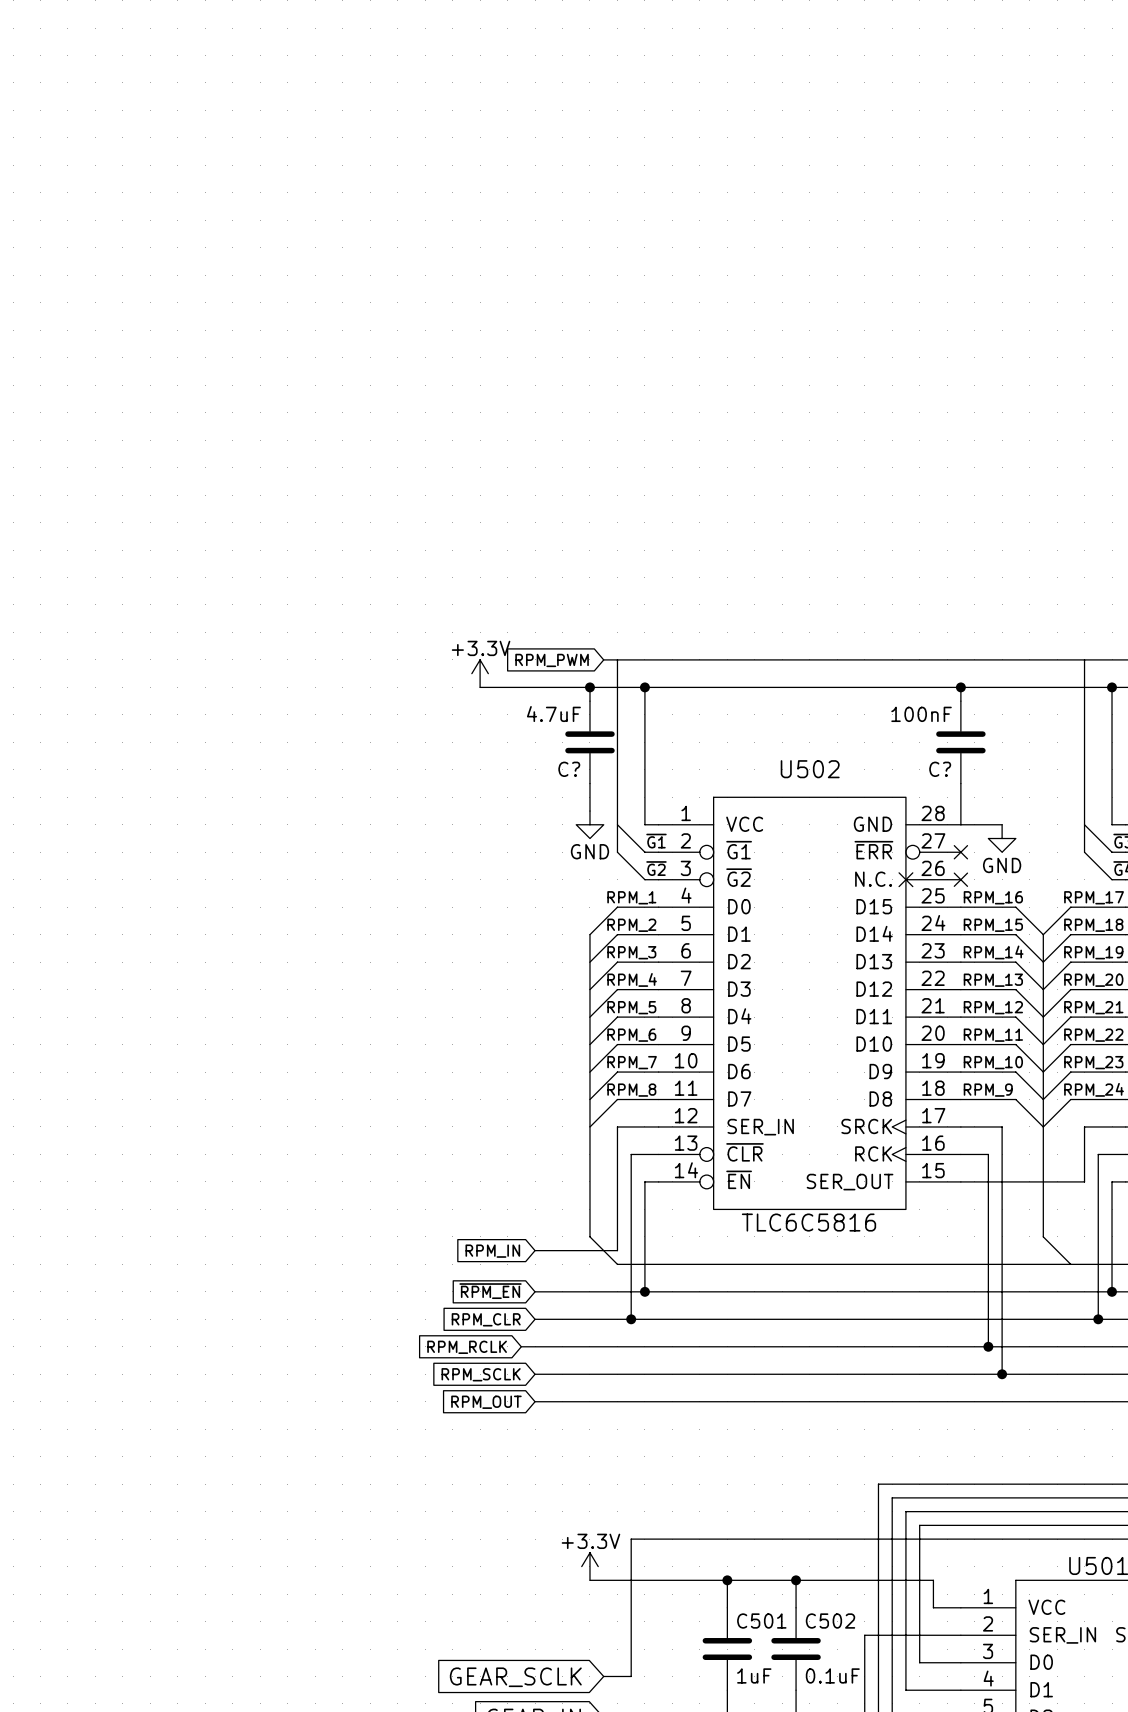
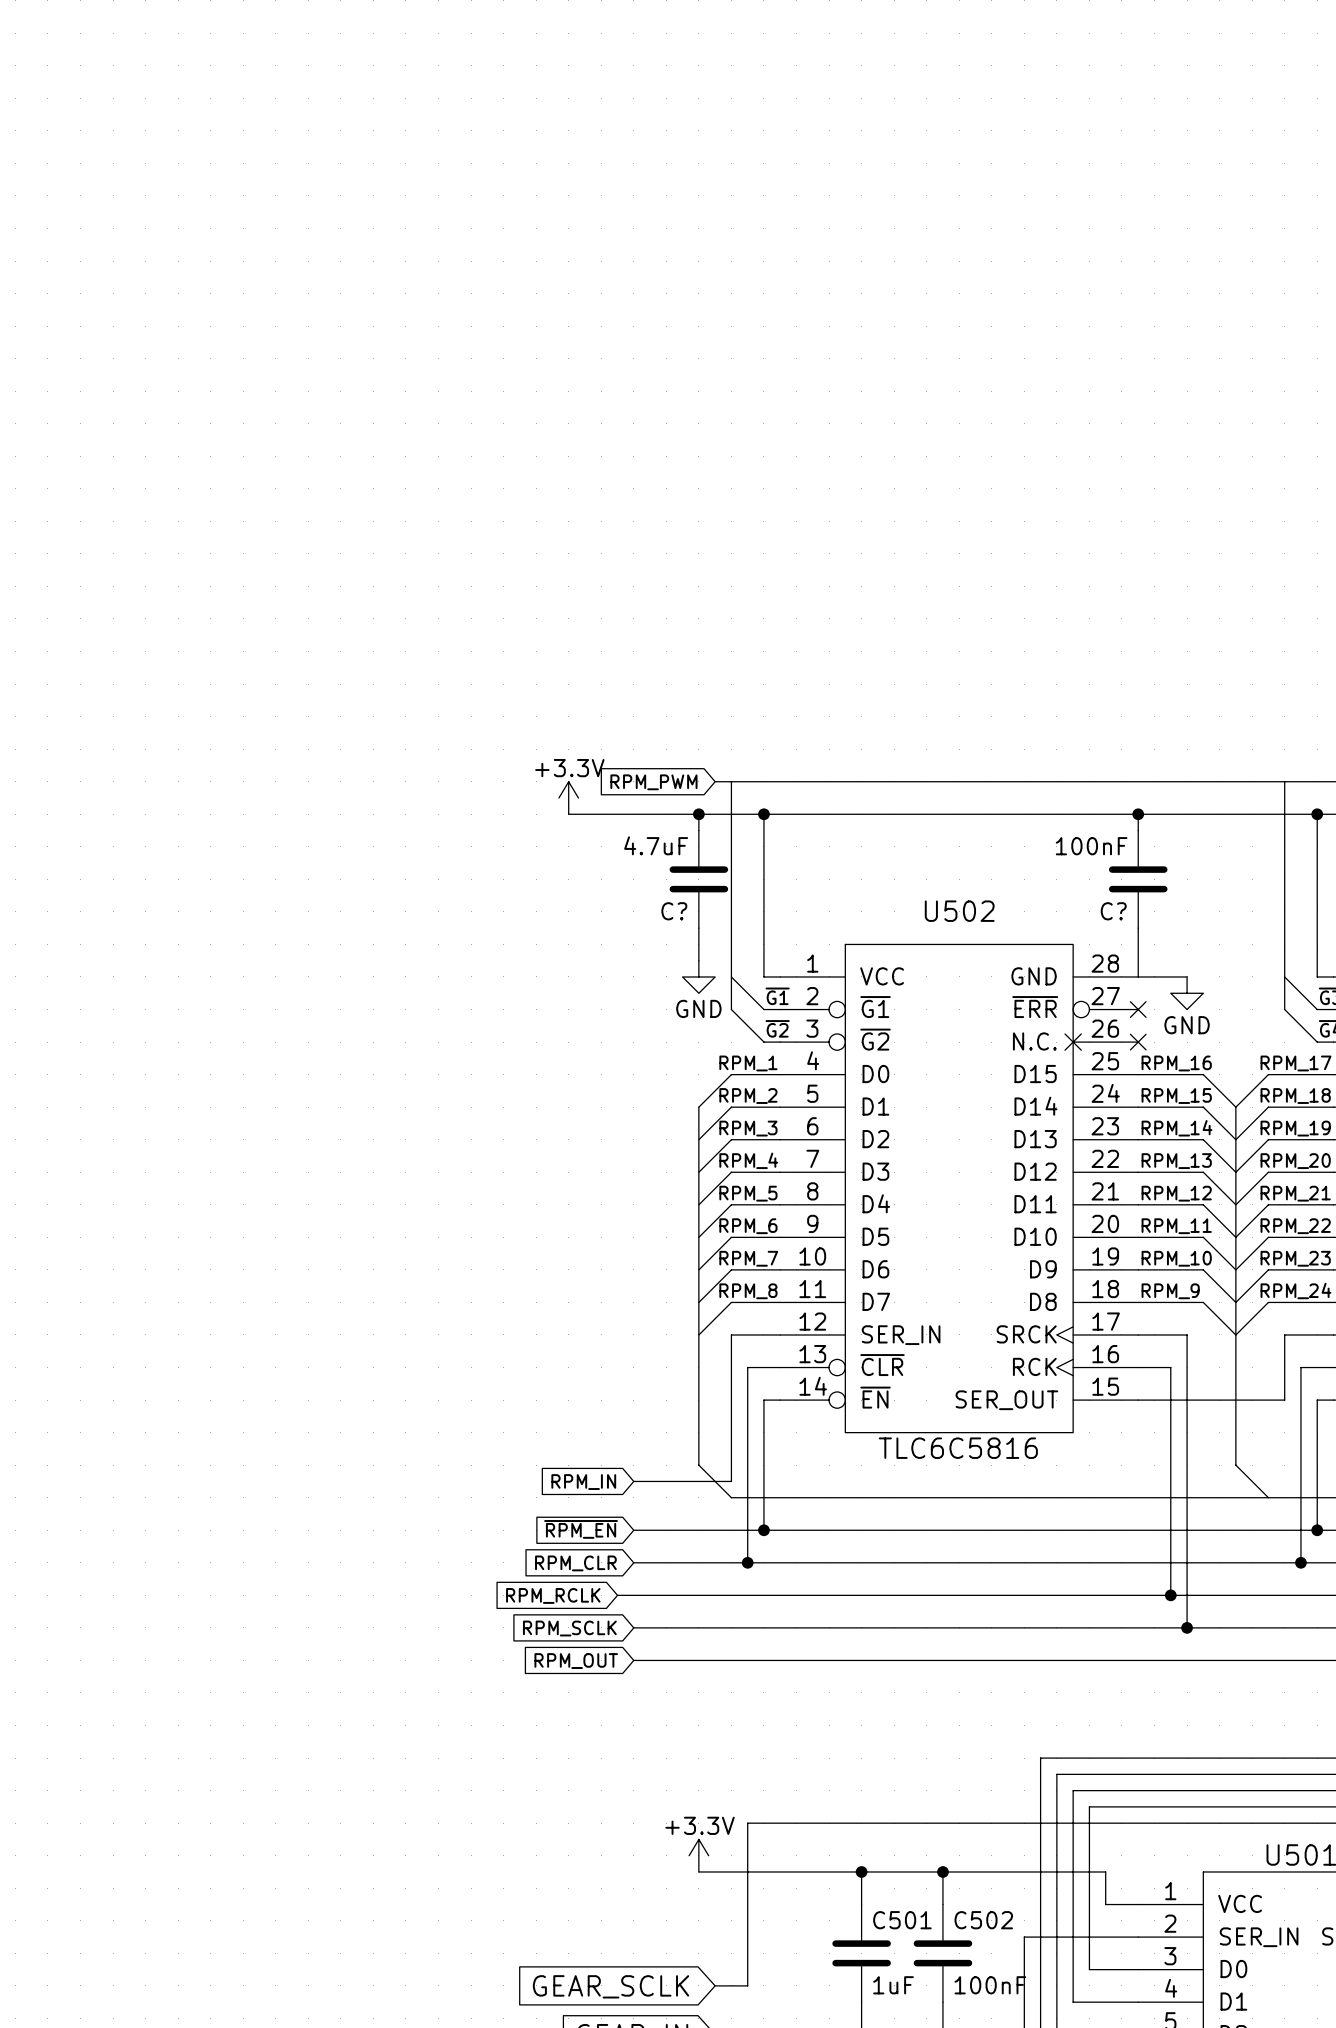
C502 value: 0.1uF (832, 1675) -> 100nF (990, 1985)

